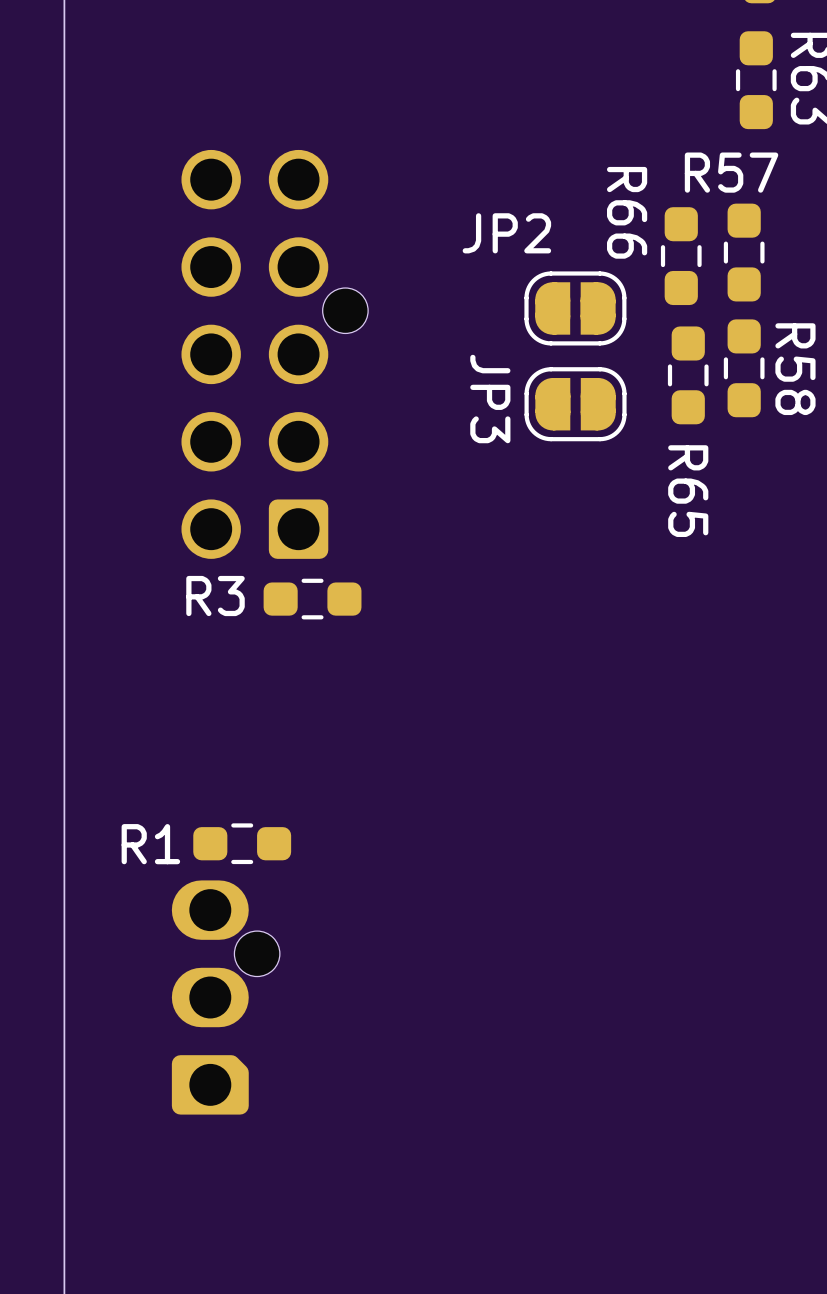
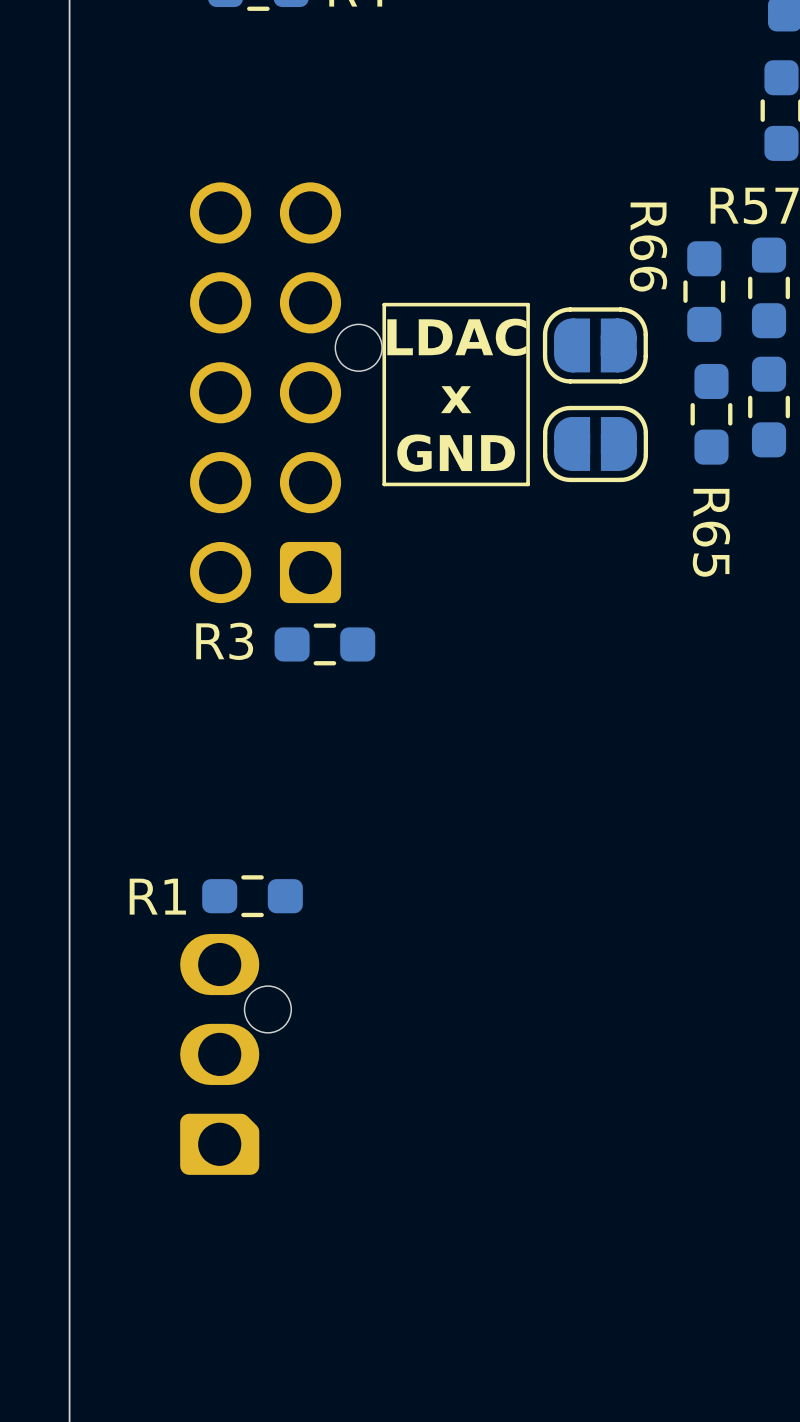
JP2 name: JP2 (506, 233) -> none
line: none -> (528, 304) (384, 304) (384, 484) (528, 484) (528, 304)
text: none -> LDAC (456, 337)
text: none -> x (456, 399)
JP3 name: JP3 (490, 399) -> none
text: none -> GND (456, 453)

